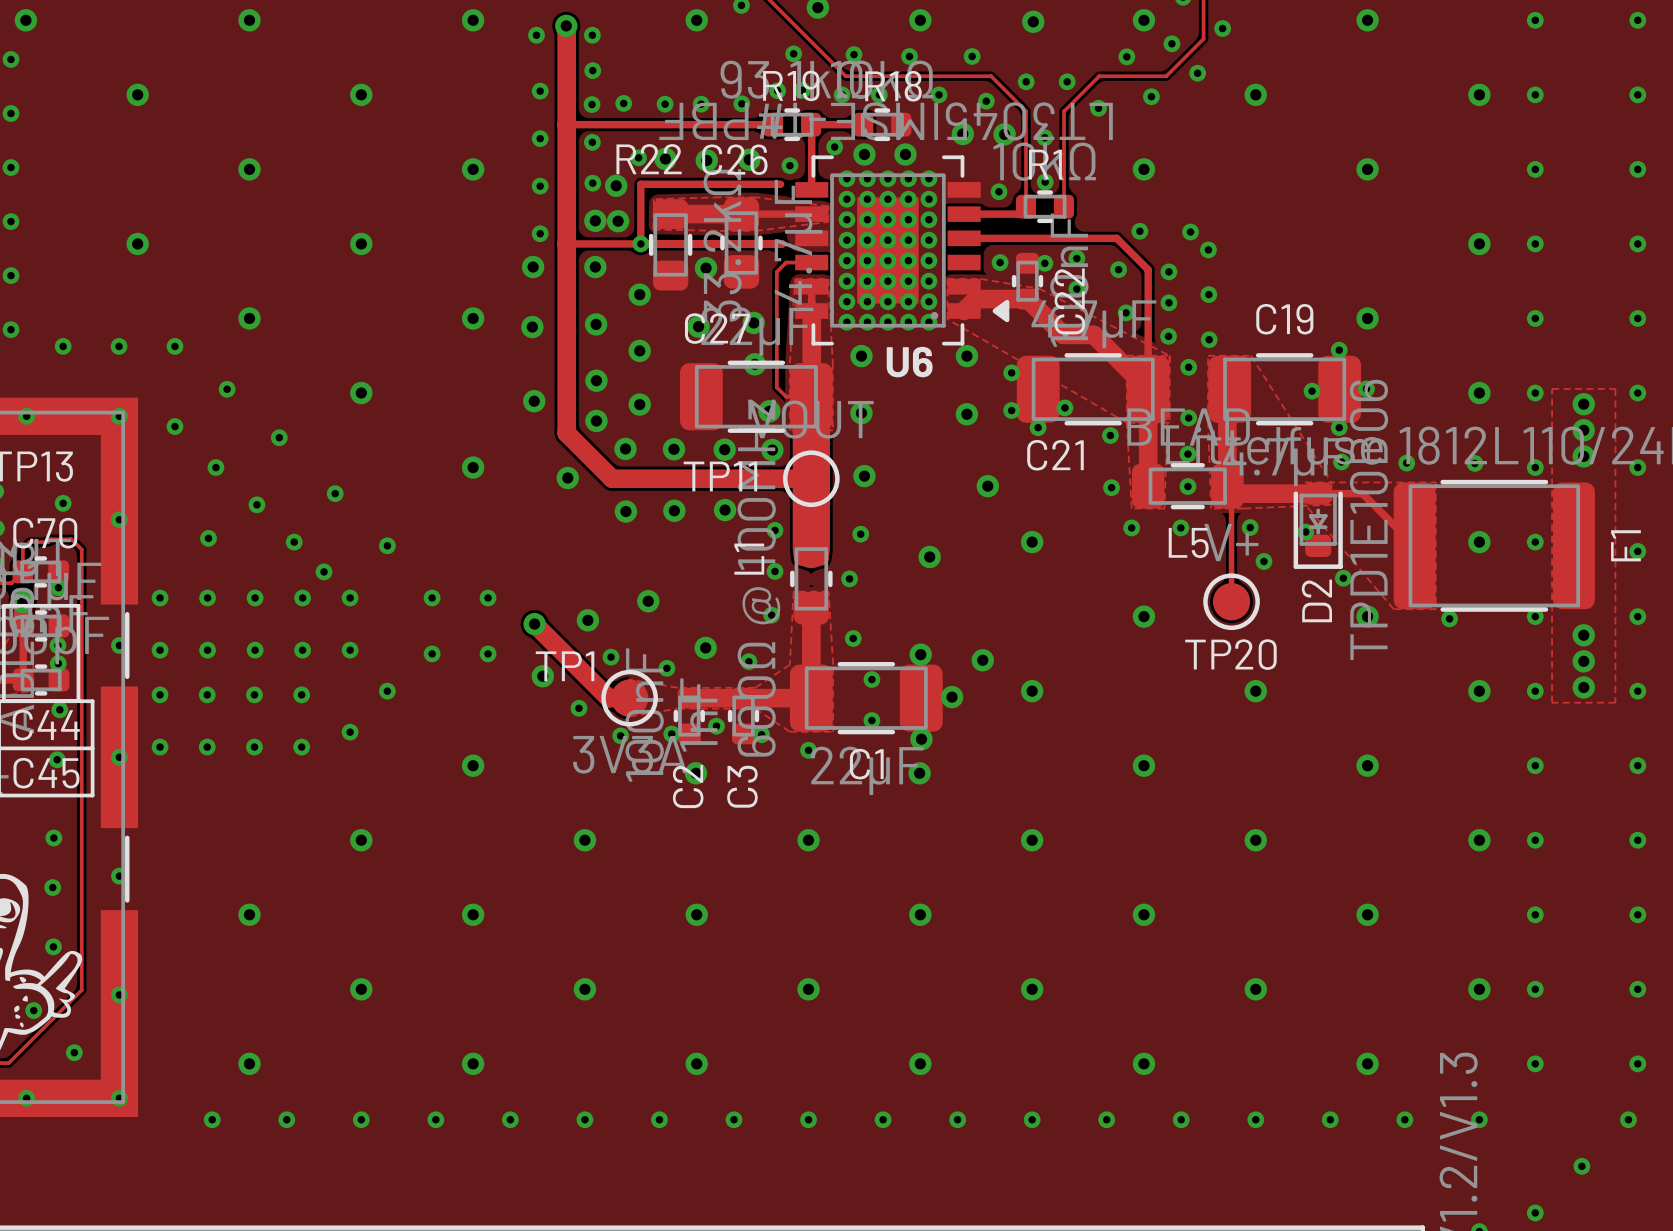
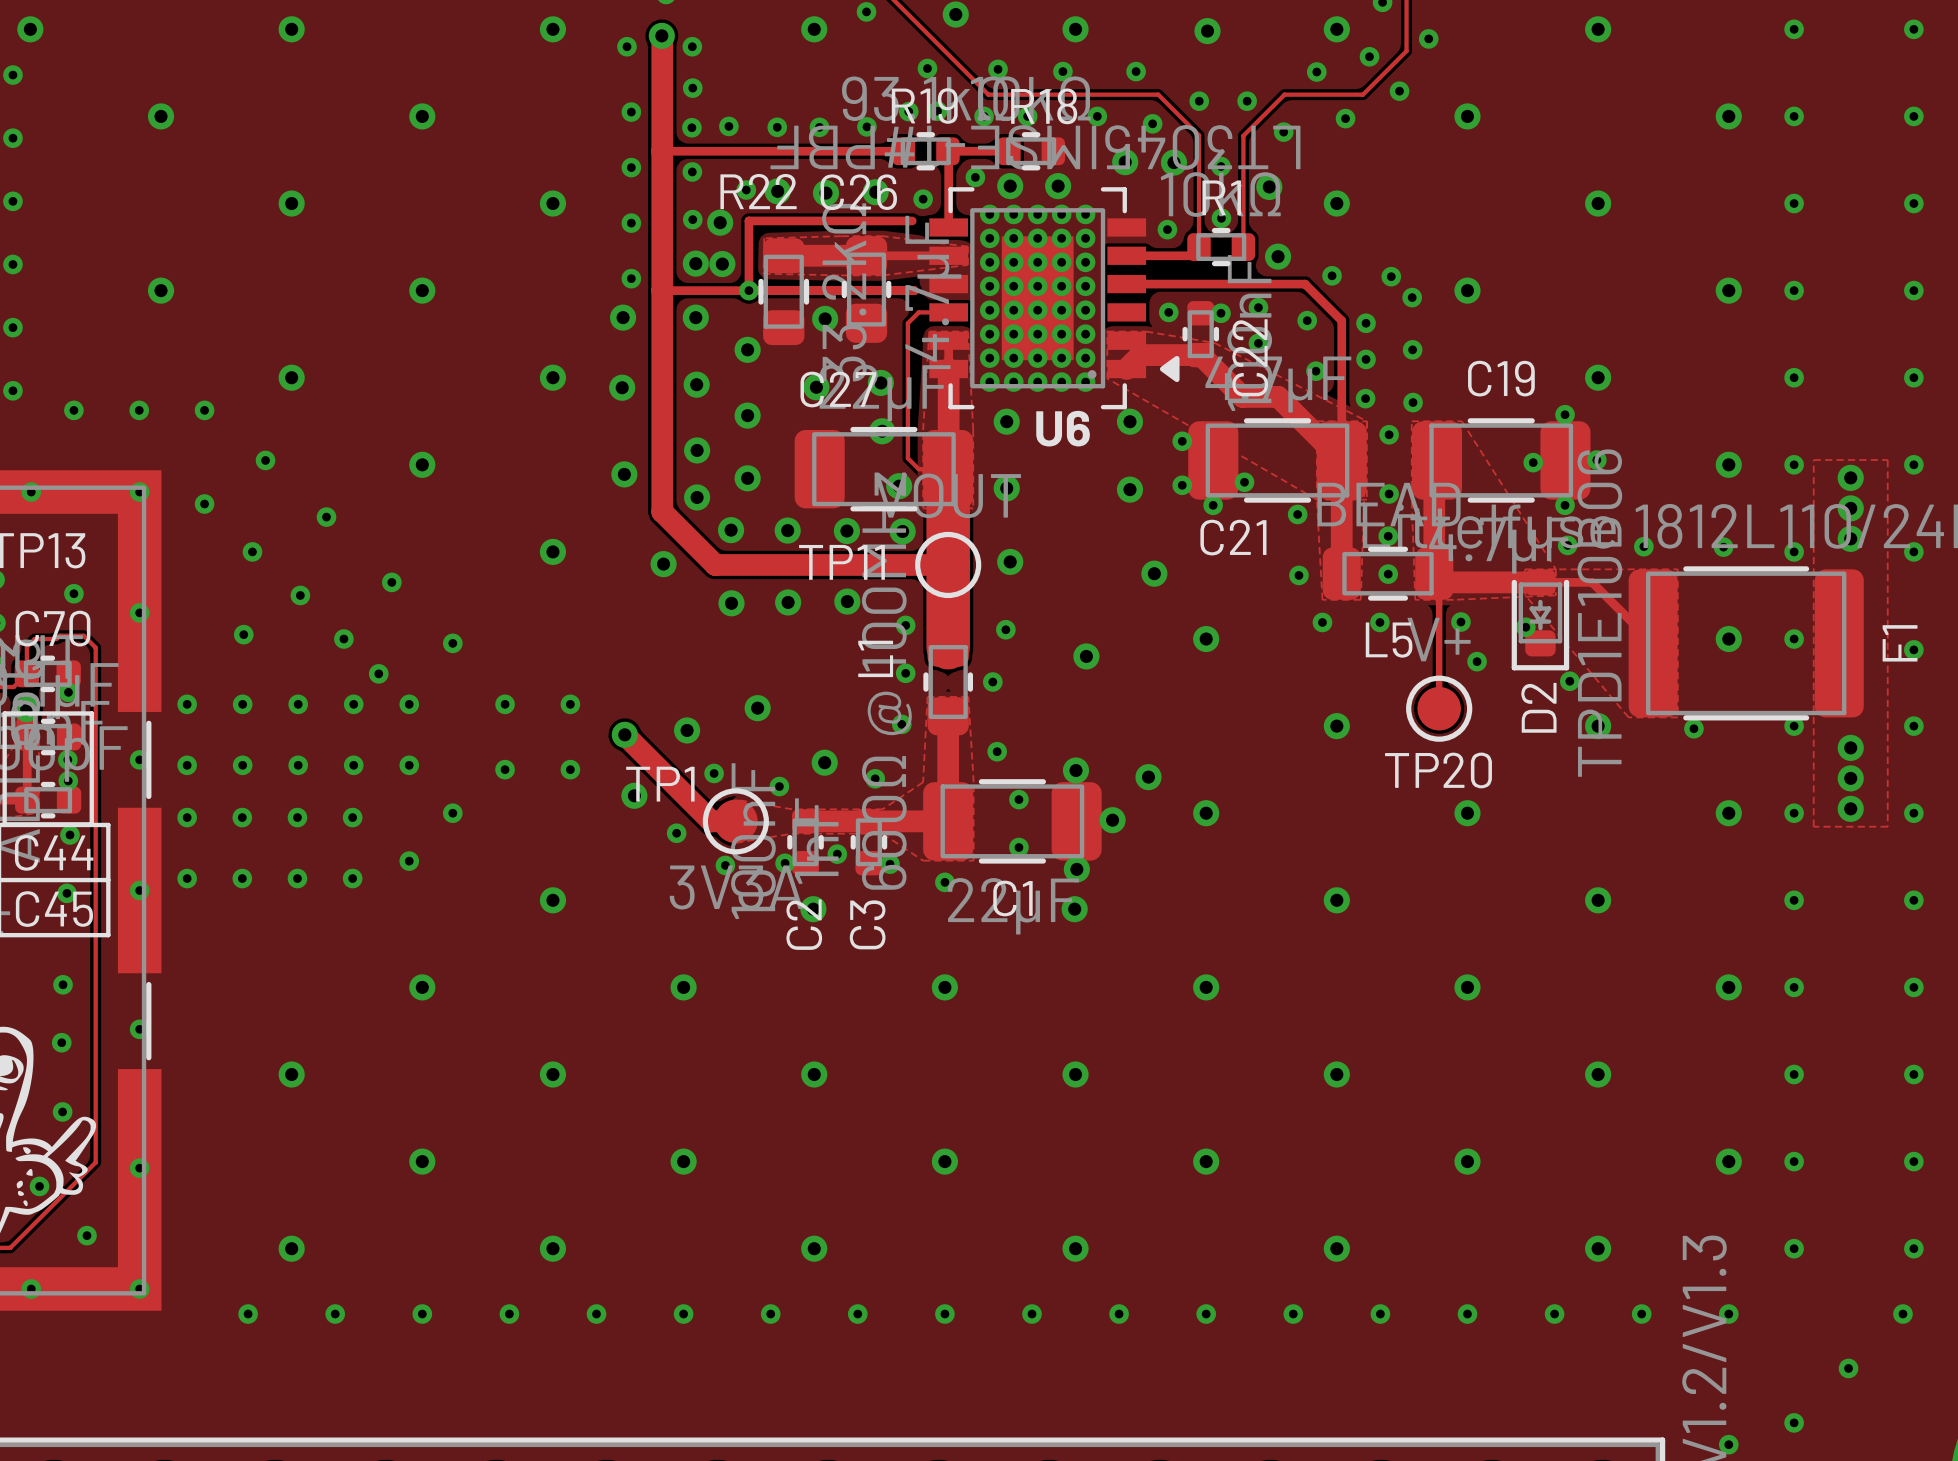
via: none -> (1269, 186)
via: none -> (1278, 256)
via: none -> (1467, 290)

